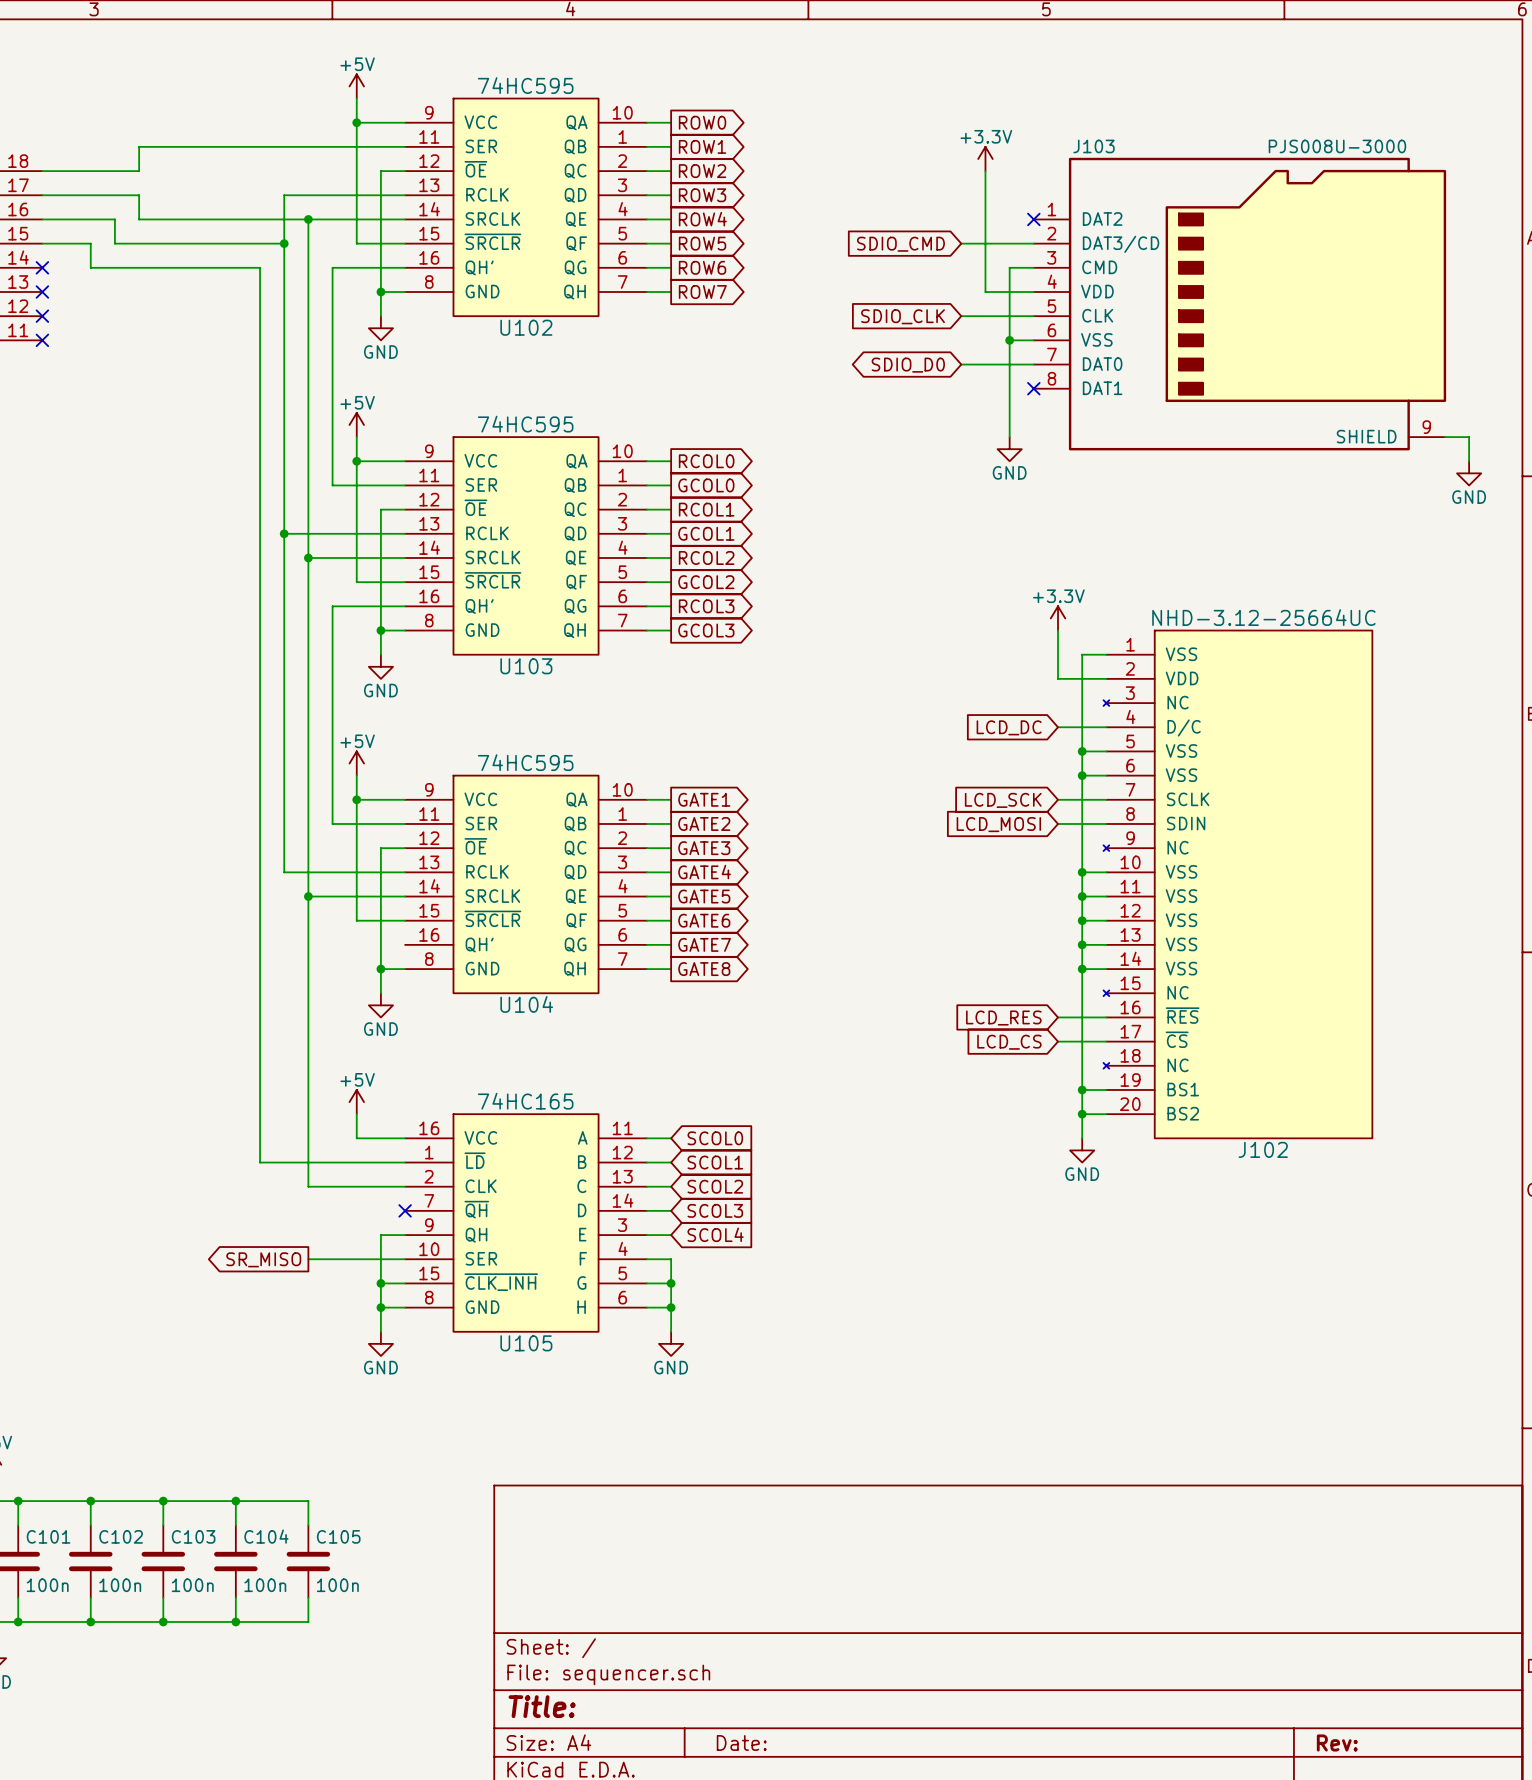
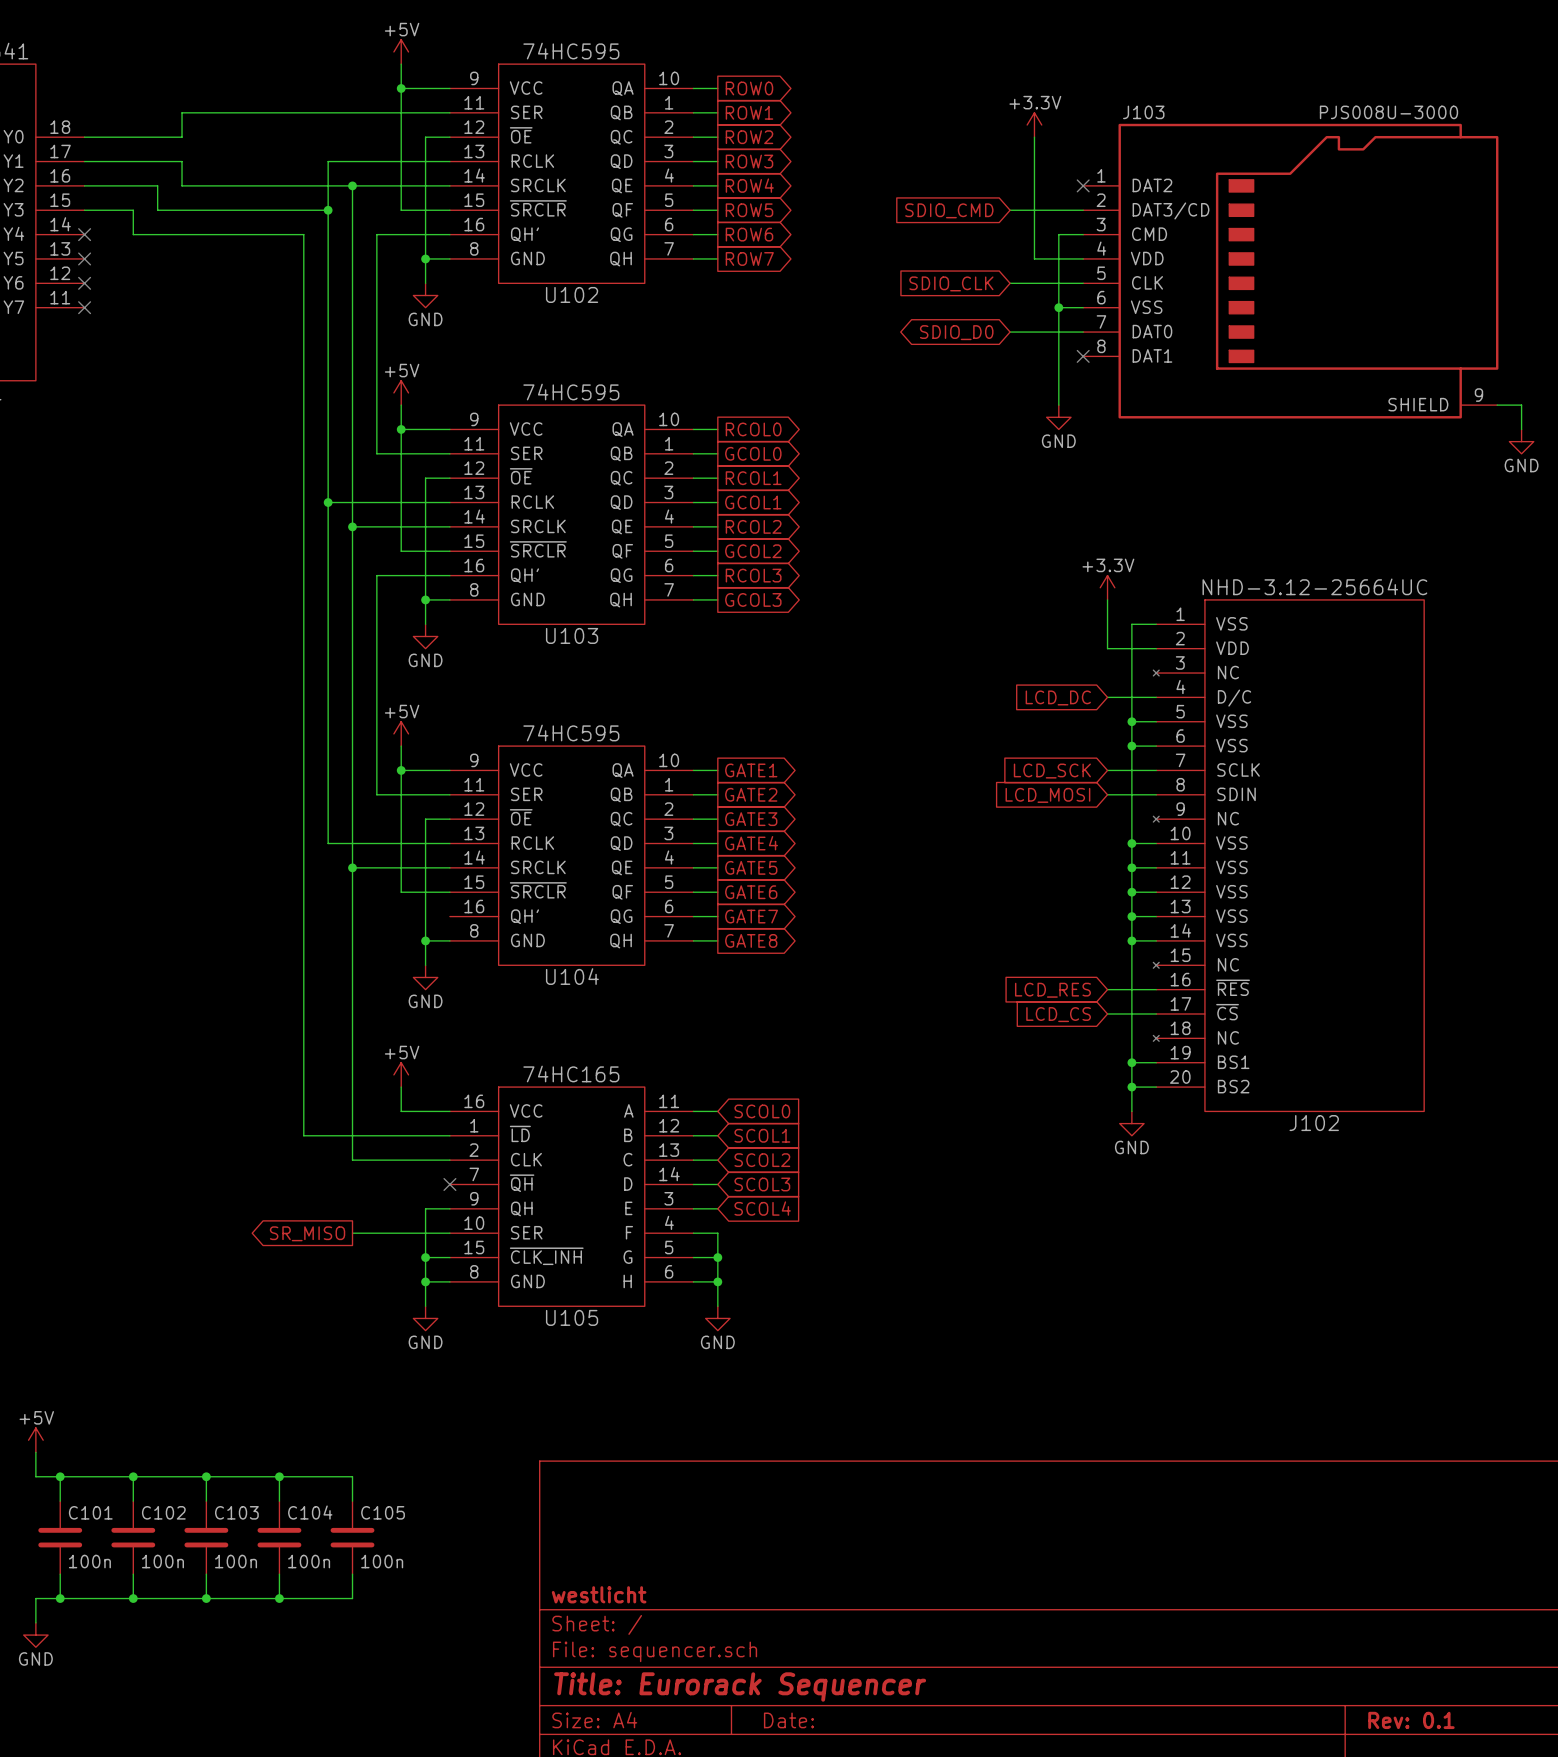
title block: none -> westlicht (599, 1594)
title block: Title: (542, 1706) -> Title: Eurorack Sequencer (740, 1687)
title block: Rev: (1337, 1742) -> Rev: 0.1 (1411, 1720)

